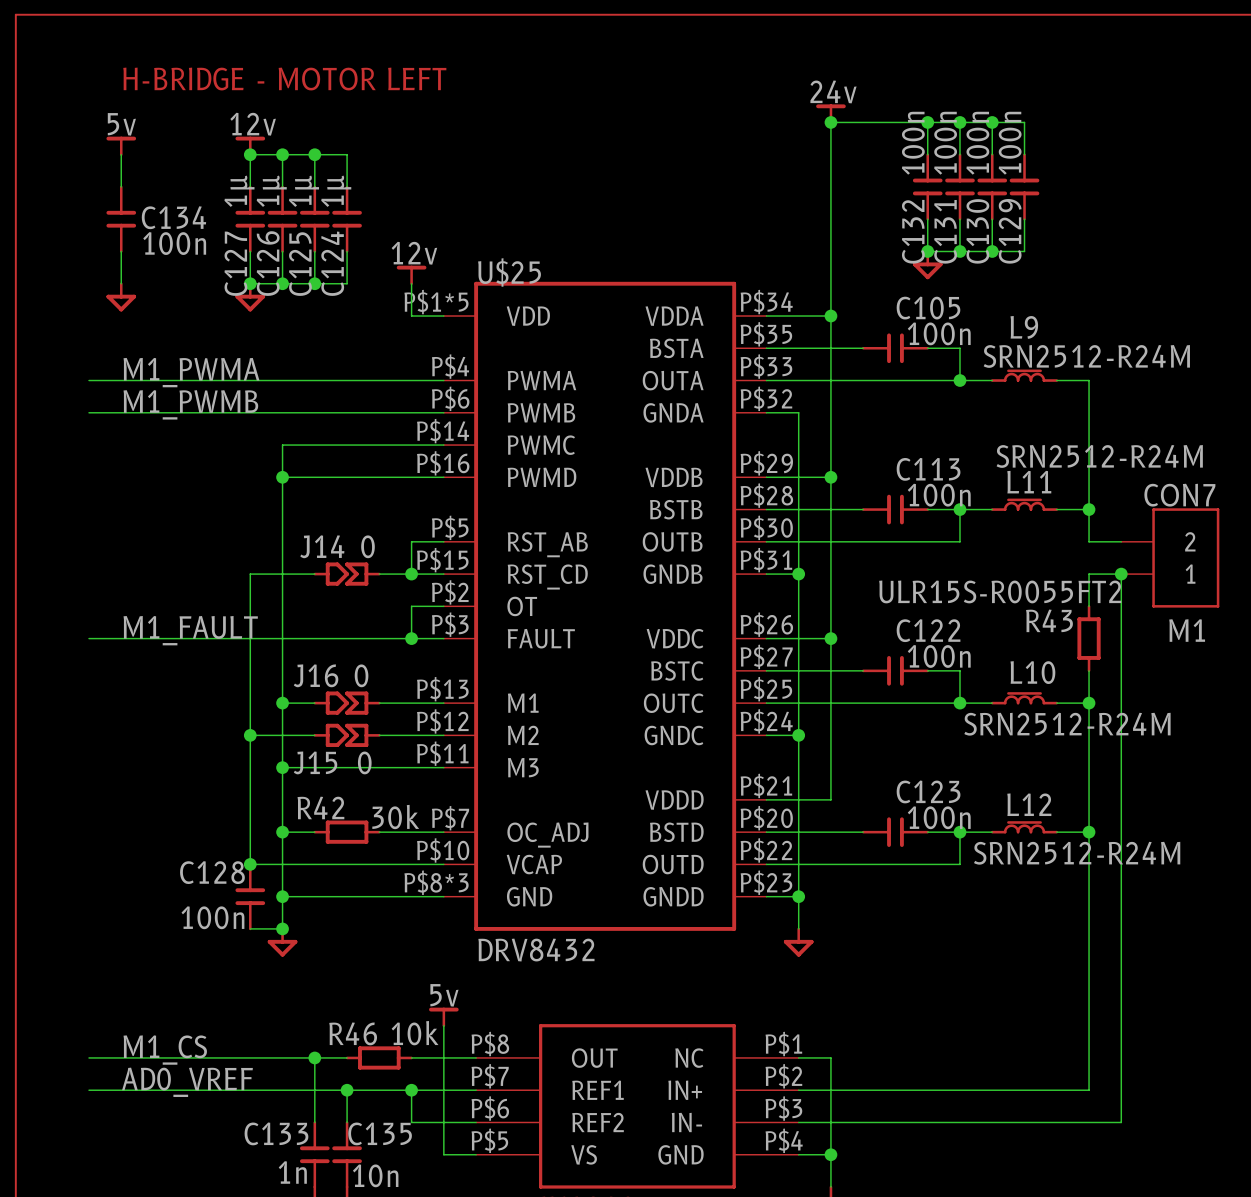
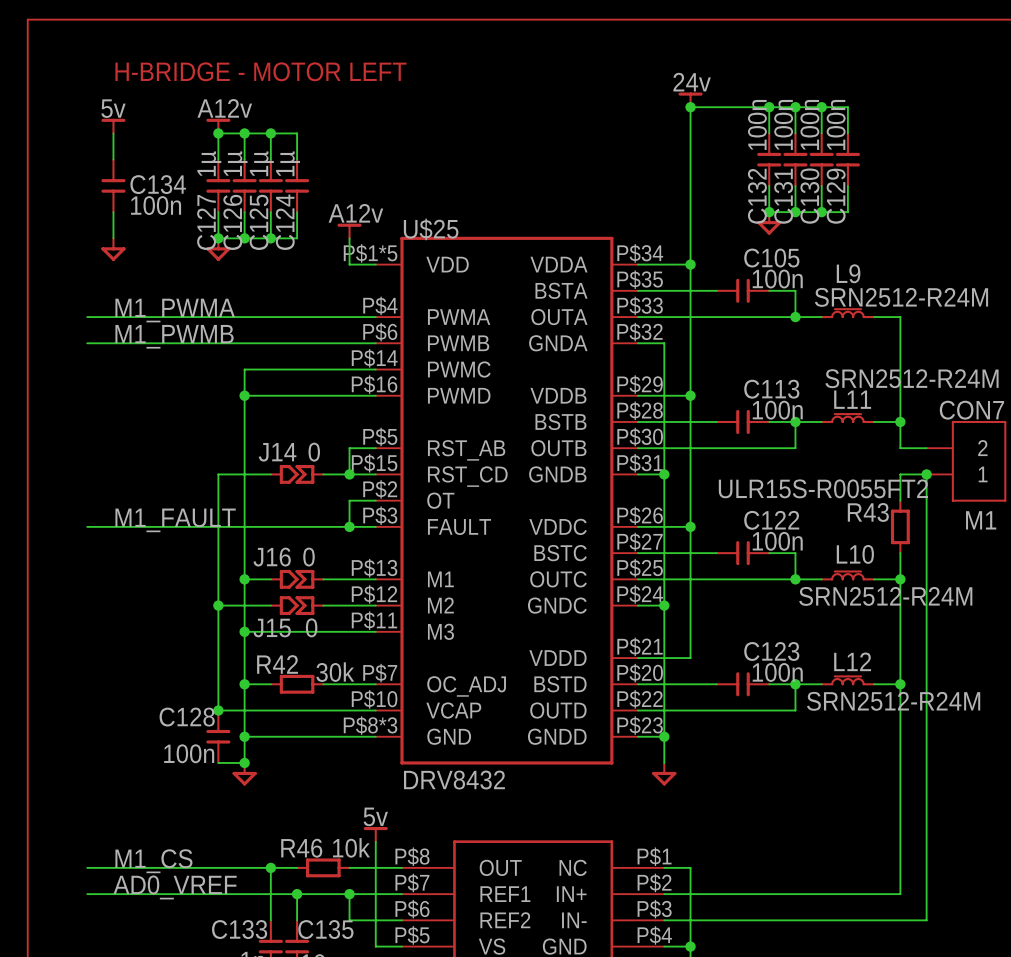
power symbol text: 12v (253, 124) -> none
power symbol text: none -> A12v (224, 108)
power symbol text: 12v (414, 253) -> none
power symbol text: none -> A12v (355, 213)

